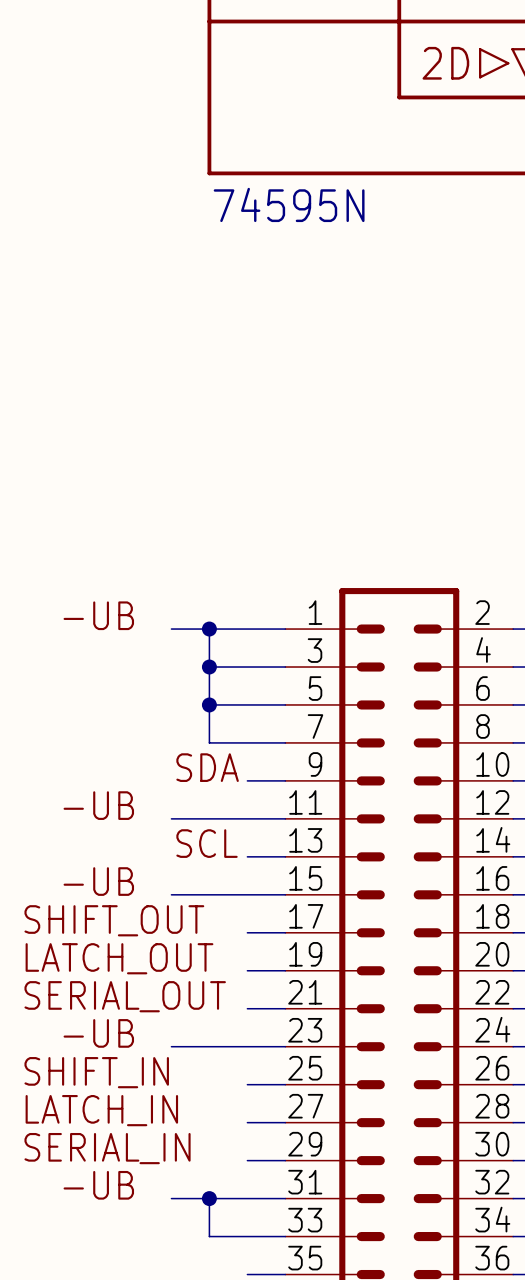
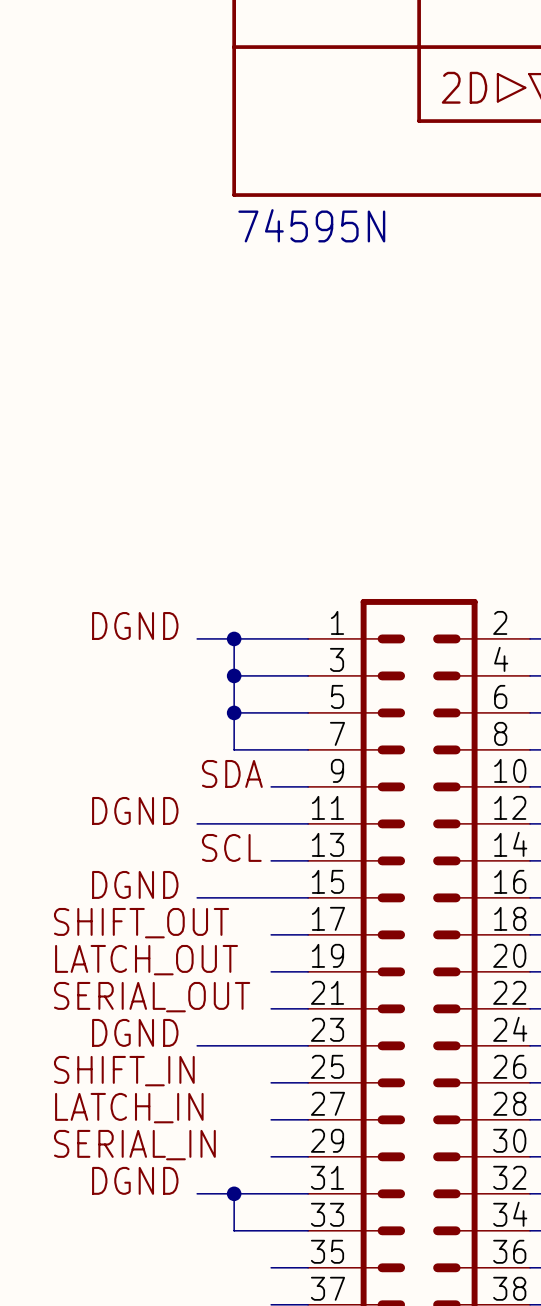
label: -UB (98, 615) -> DGND (135, 625)
label: -UB (98, 805) -> DGND (135, 810)
label: -UB (98, 881) -> DGND (135, 884)
label: -UB (98, 1033) -> DGND (135, 1032)
label: -UB (98, 1185) -> DGND (135, 1180)

